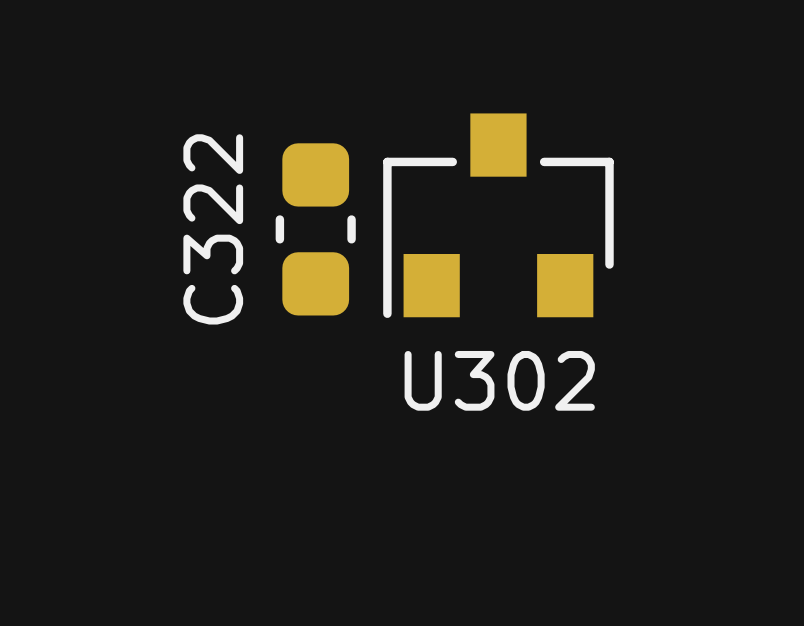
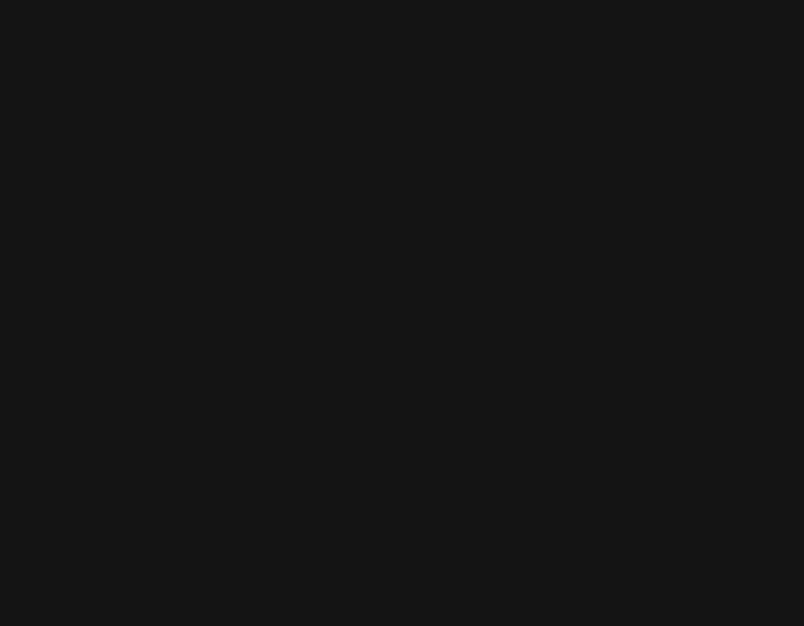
U302: (498, 215) -> none
C322: (315, 229) -> none

